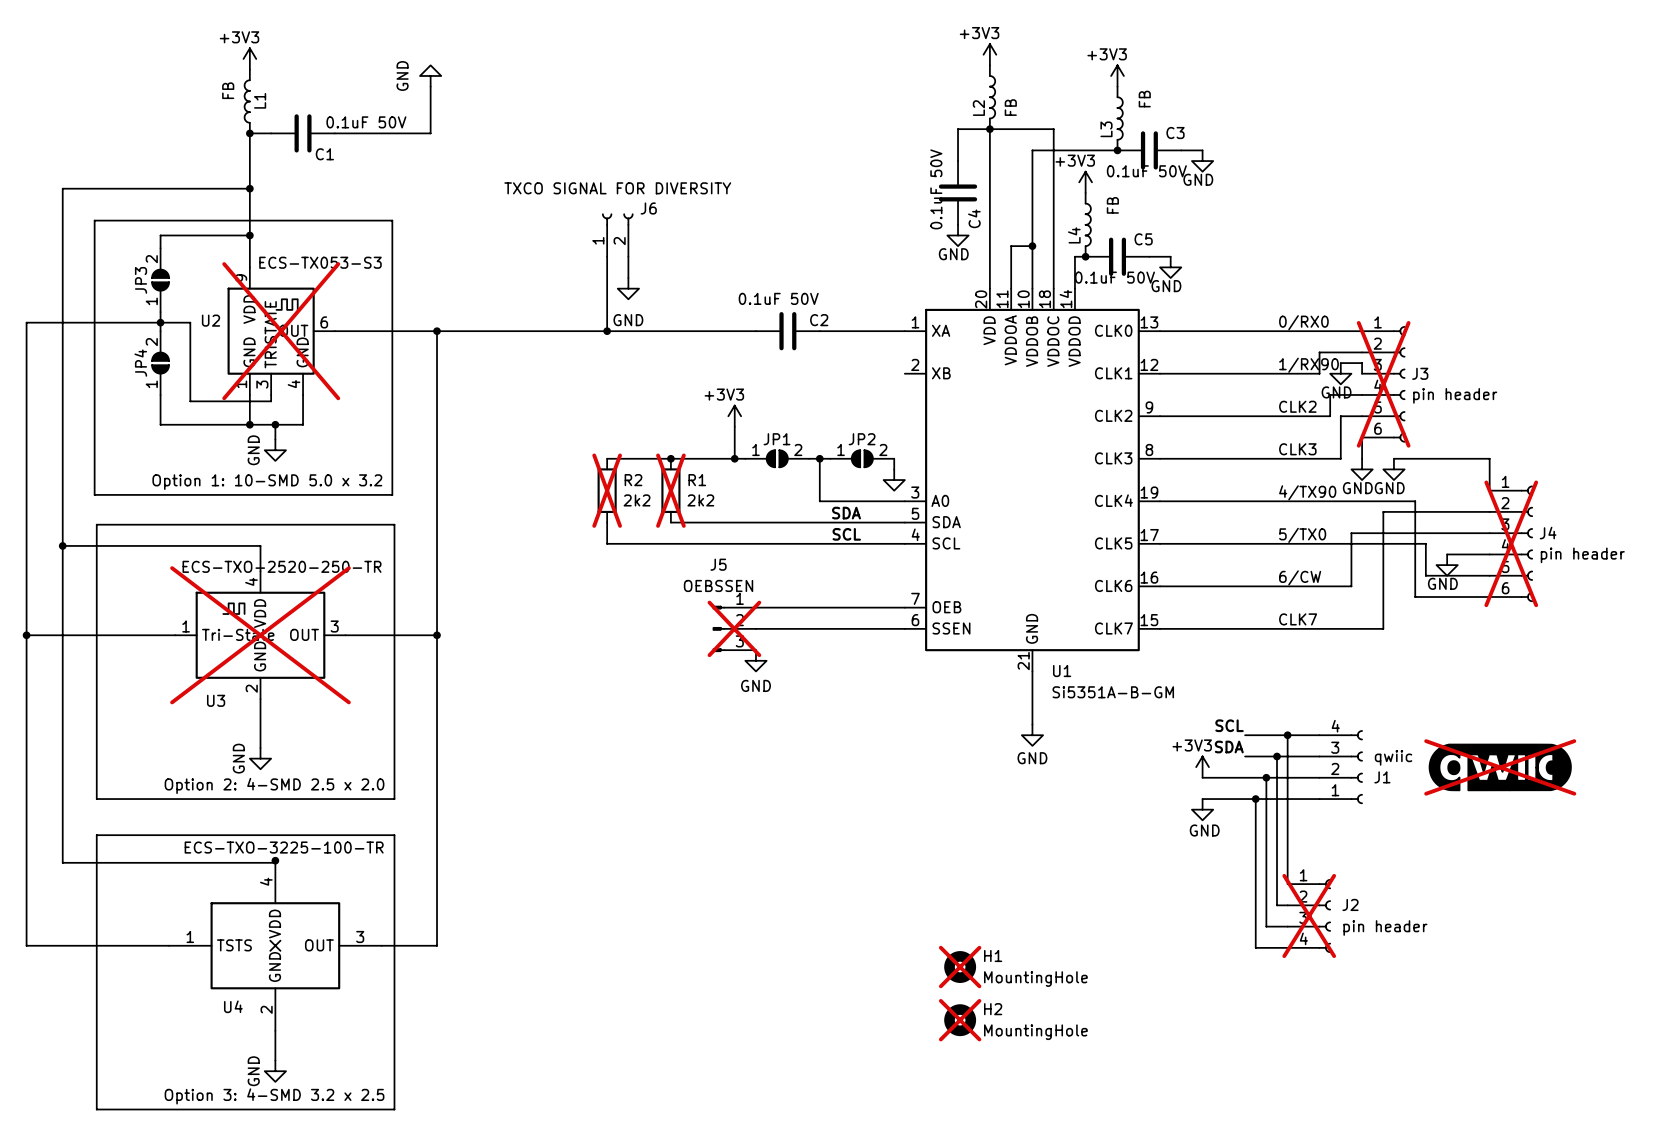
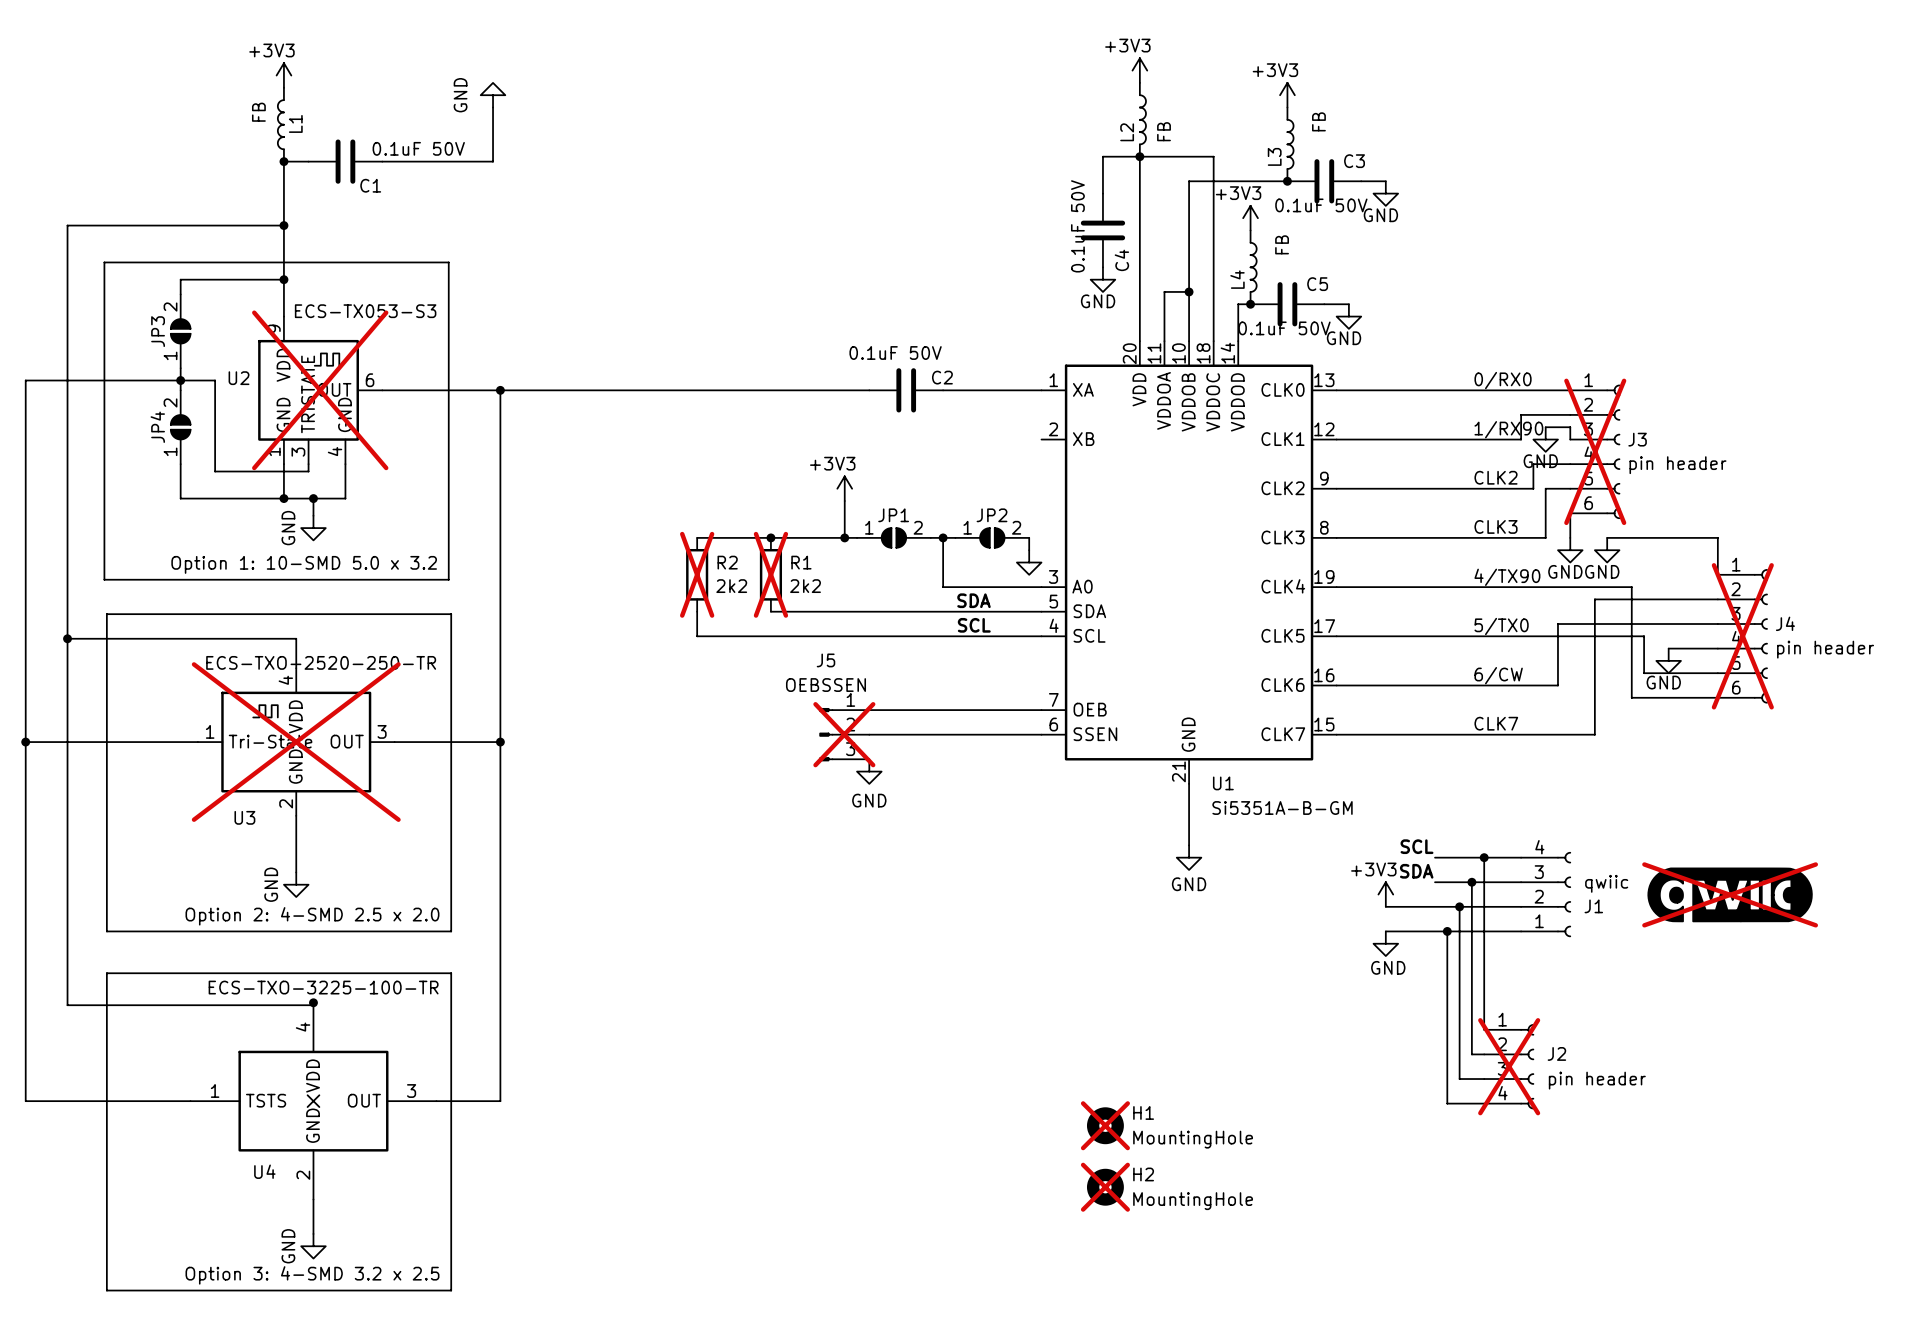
text: TXCO SIGNAL FOR DIVERSITY (617, 188) -> none
J6: (617, 235) -> none
wire: (607, 256) (607, 331) -> none
wire: (628, 256) (628, 278) -> none
power symbol: GND (628, 288) -> none
junction: (607, 331) -> none

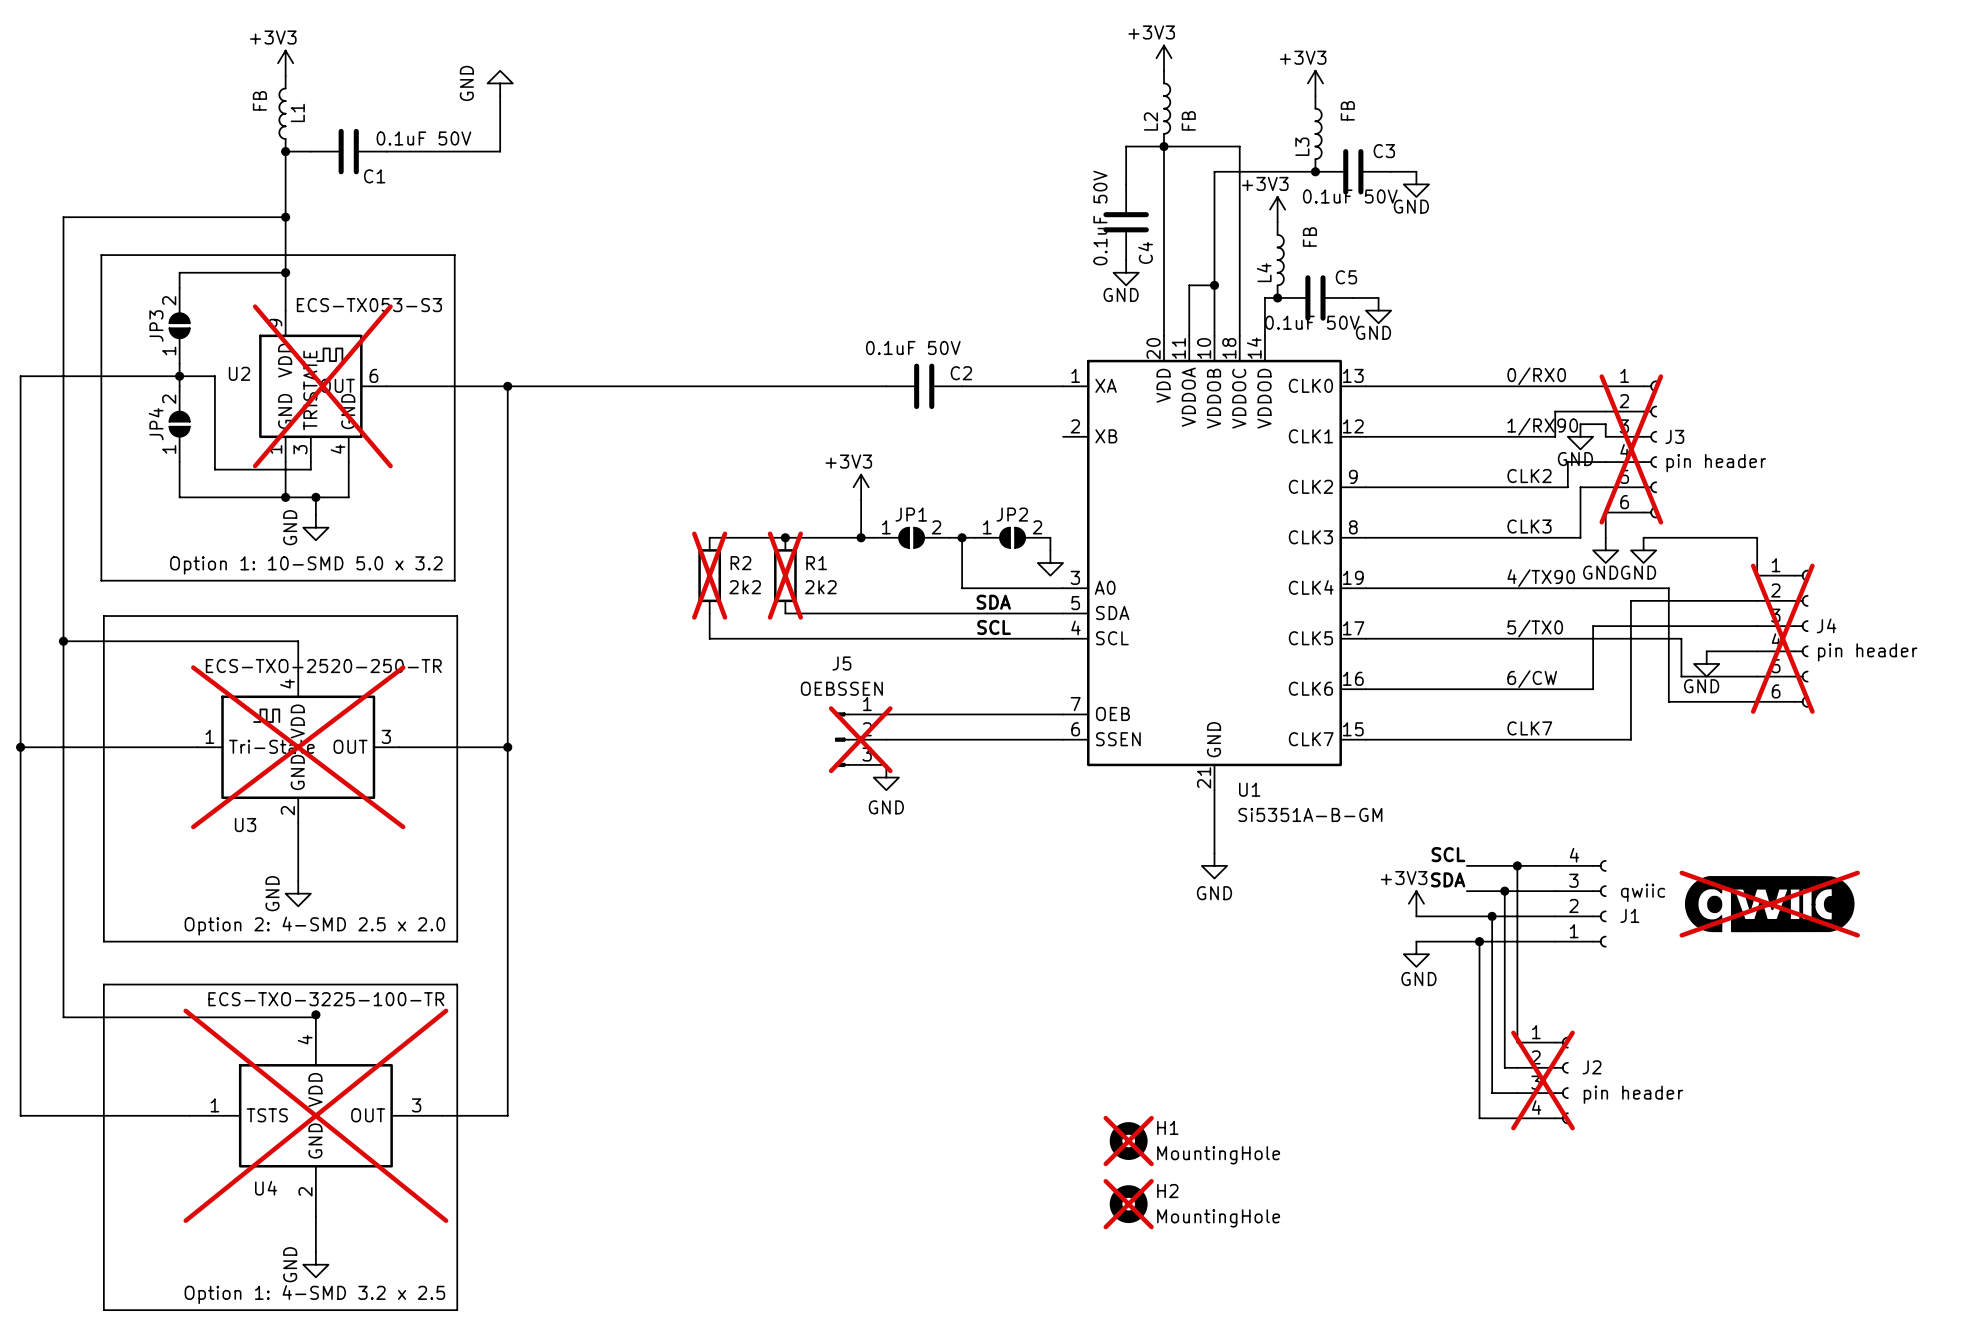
U4 do-not-place cross: none -> (315, 1115)
text: Option 3: 4-SMD 3.2 x 2.5 (312, 1275) -> Option 1: 4-SMD 3.2 x 2.5 (314, 1294)

